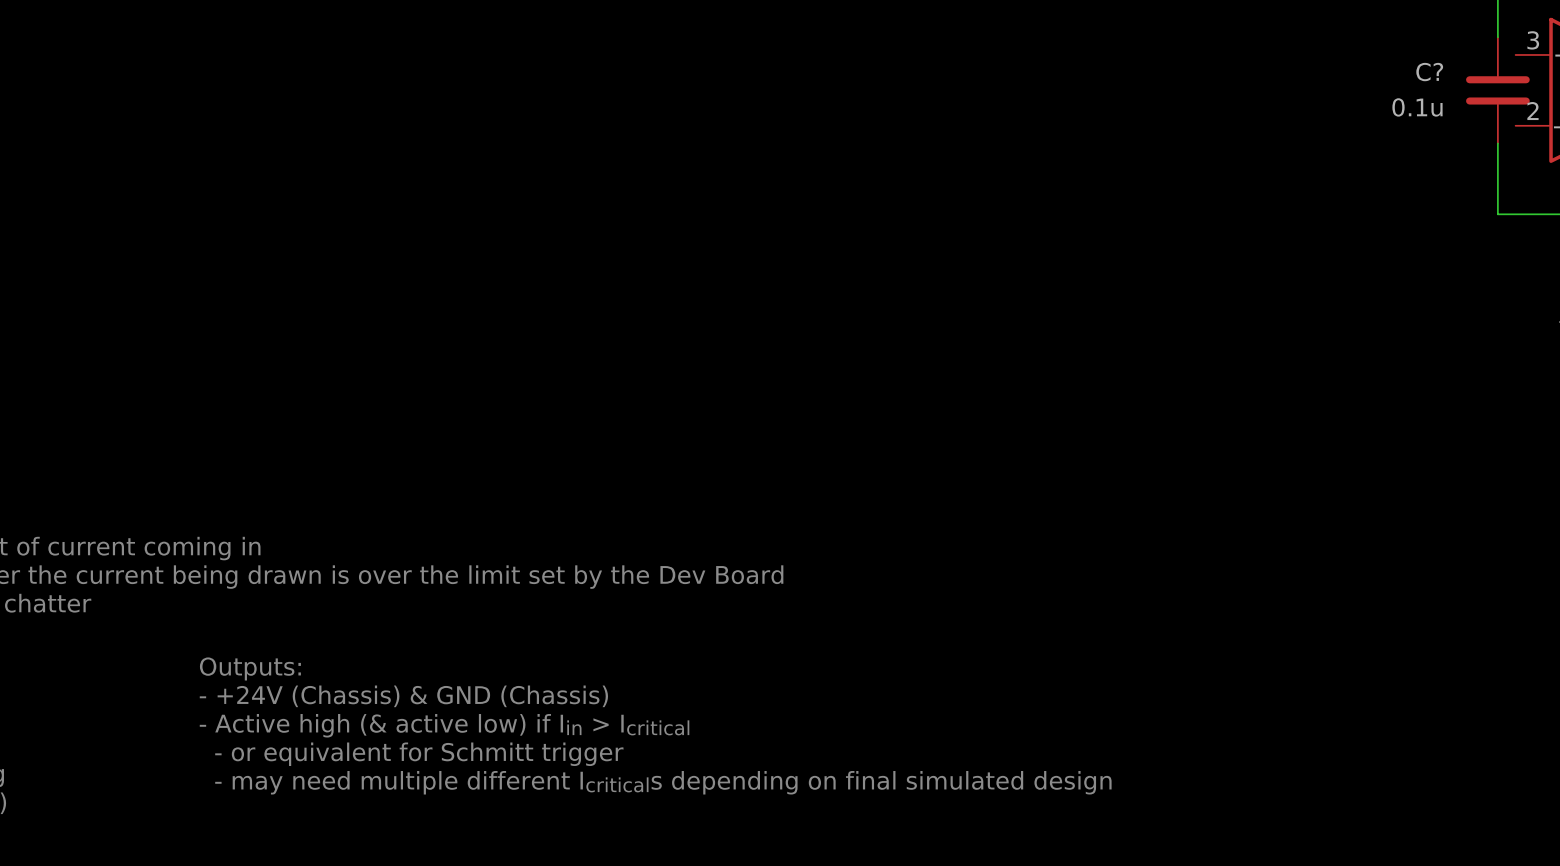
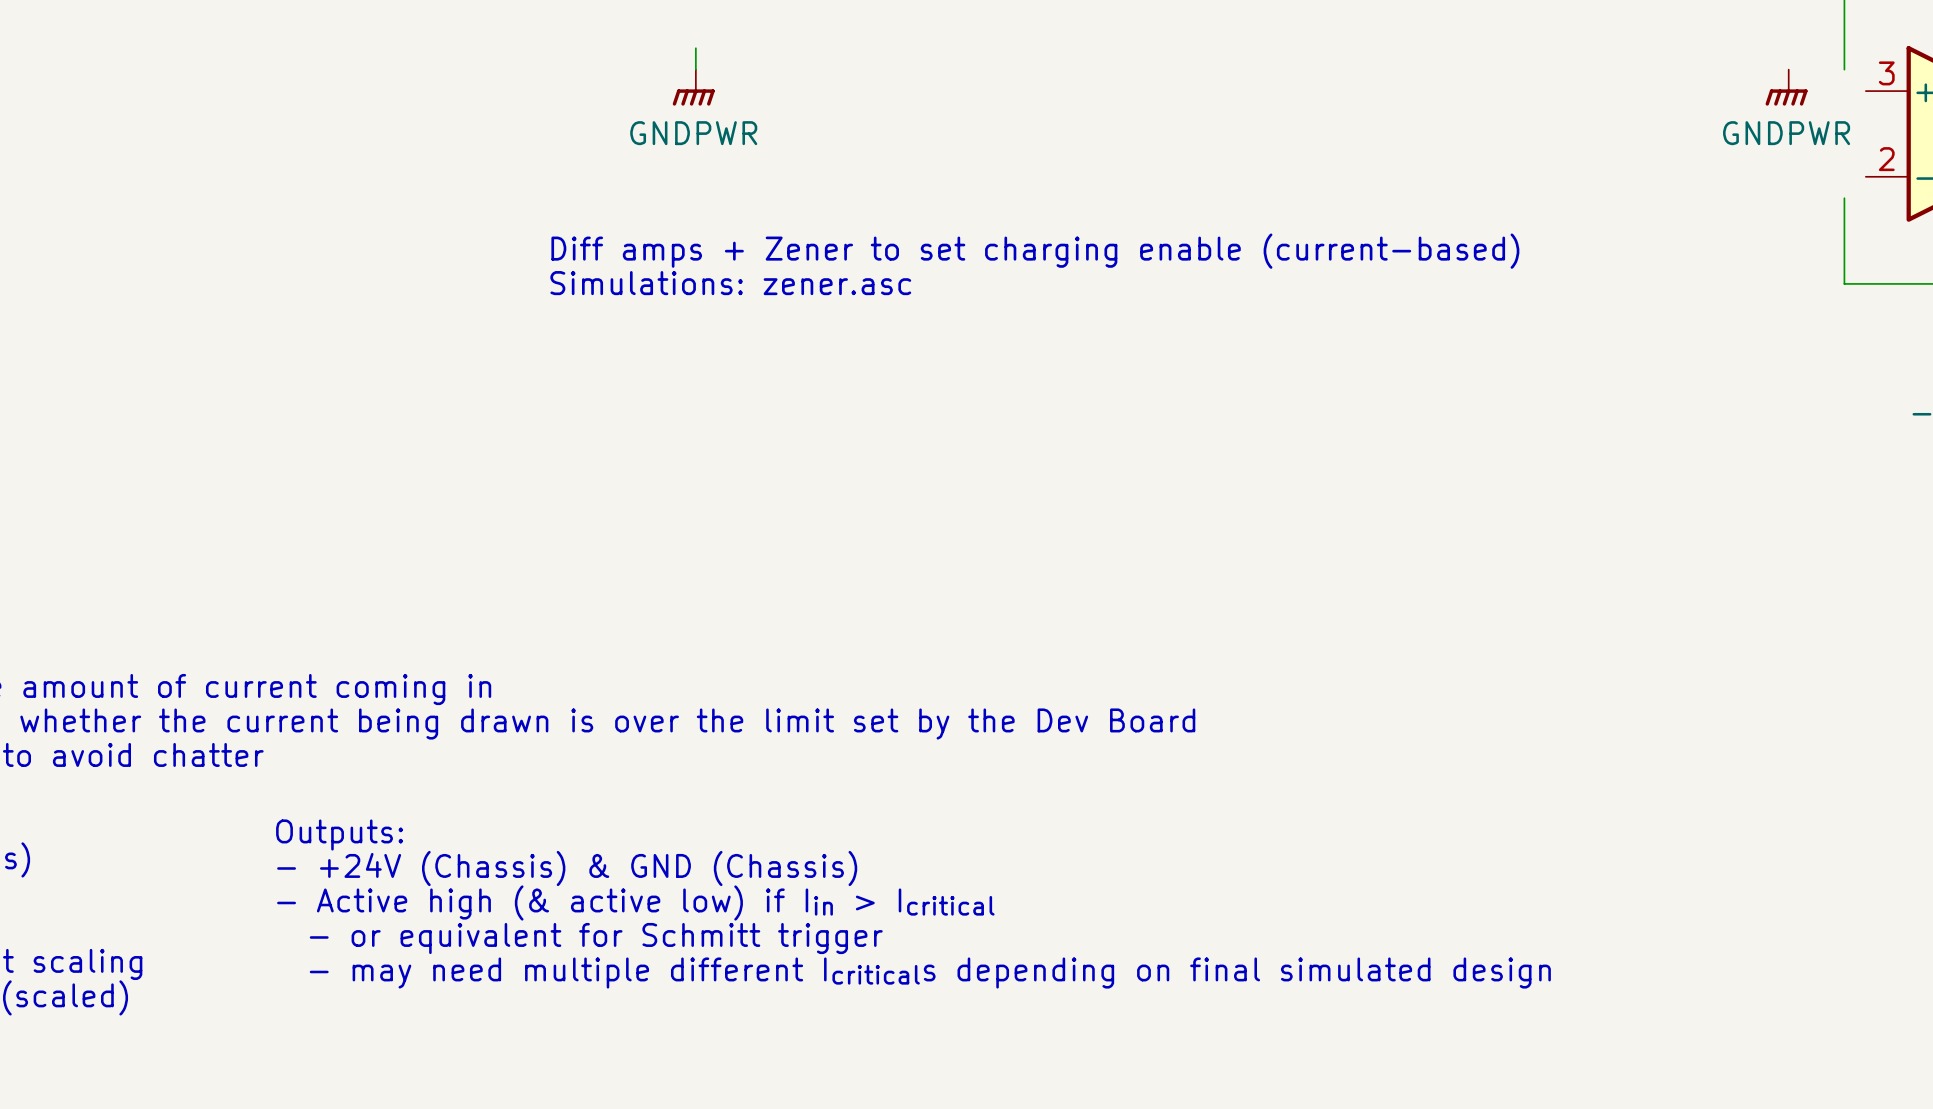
wire: none -> (695, 48) (695, 69)
power symbol: none -> GNDPWR (693, 87)
power symbol: none -> GNDPWR (1786, 87)
C?: 0.1u (1497, 90) -> none
text: none -> Diff amps + Zener to set charging enable (current-based) (1035, 251)
text: none -> Simulations: zener.asc (730, 283)

